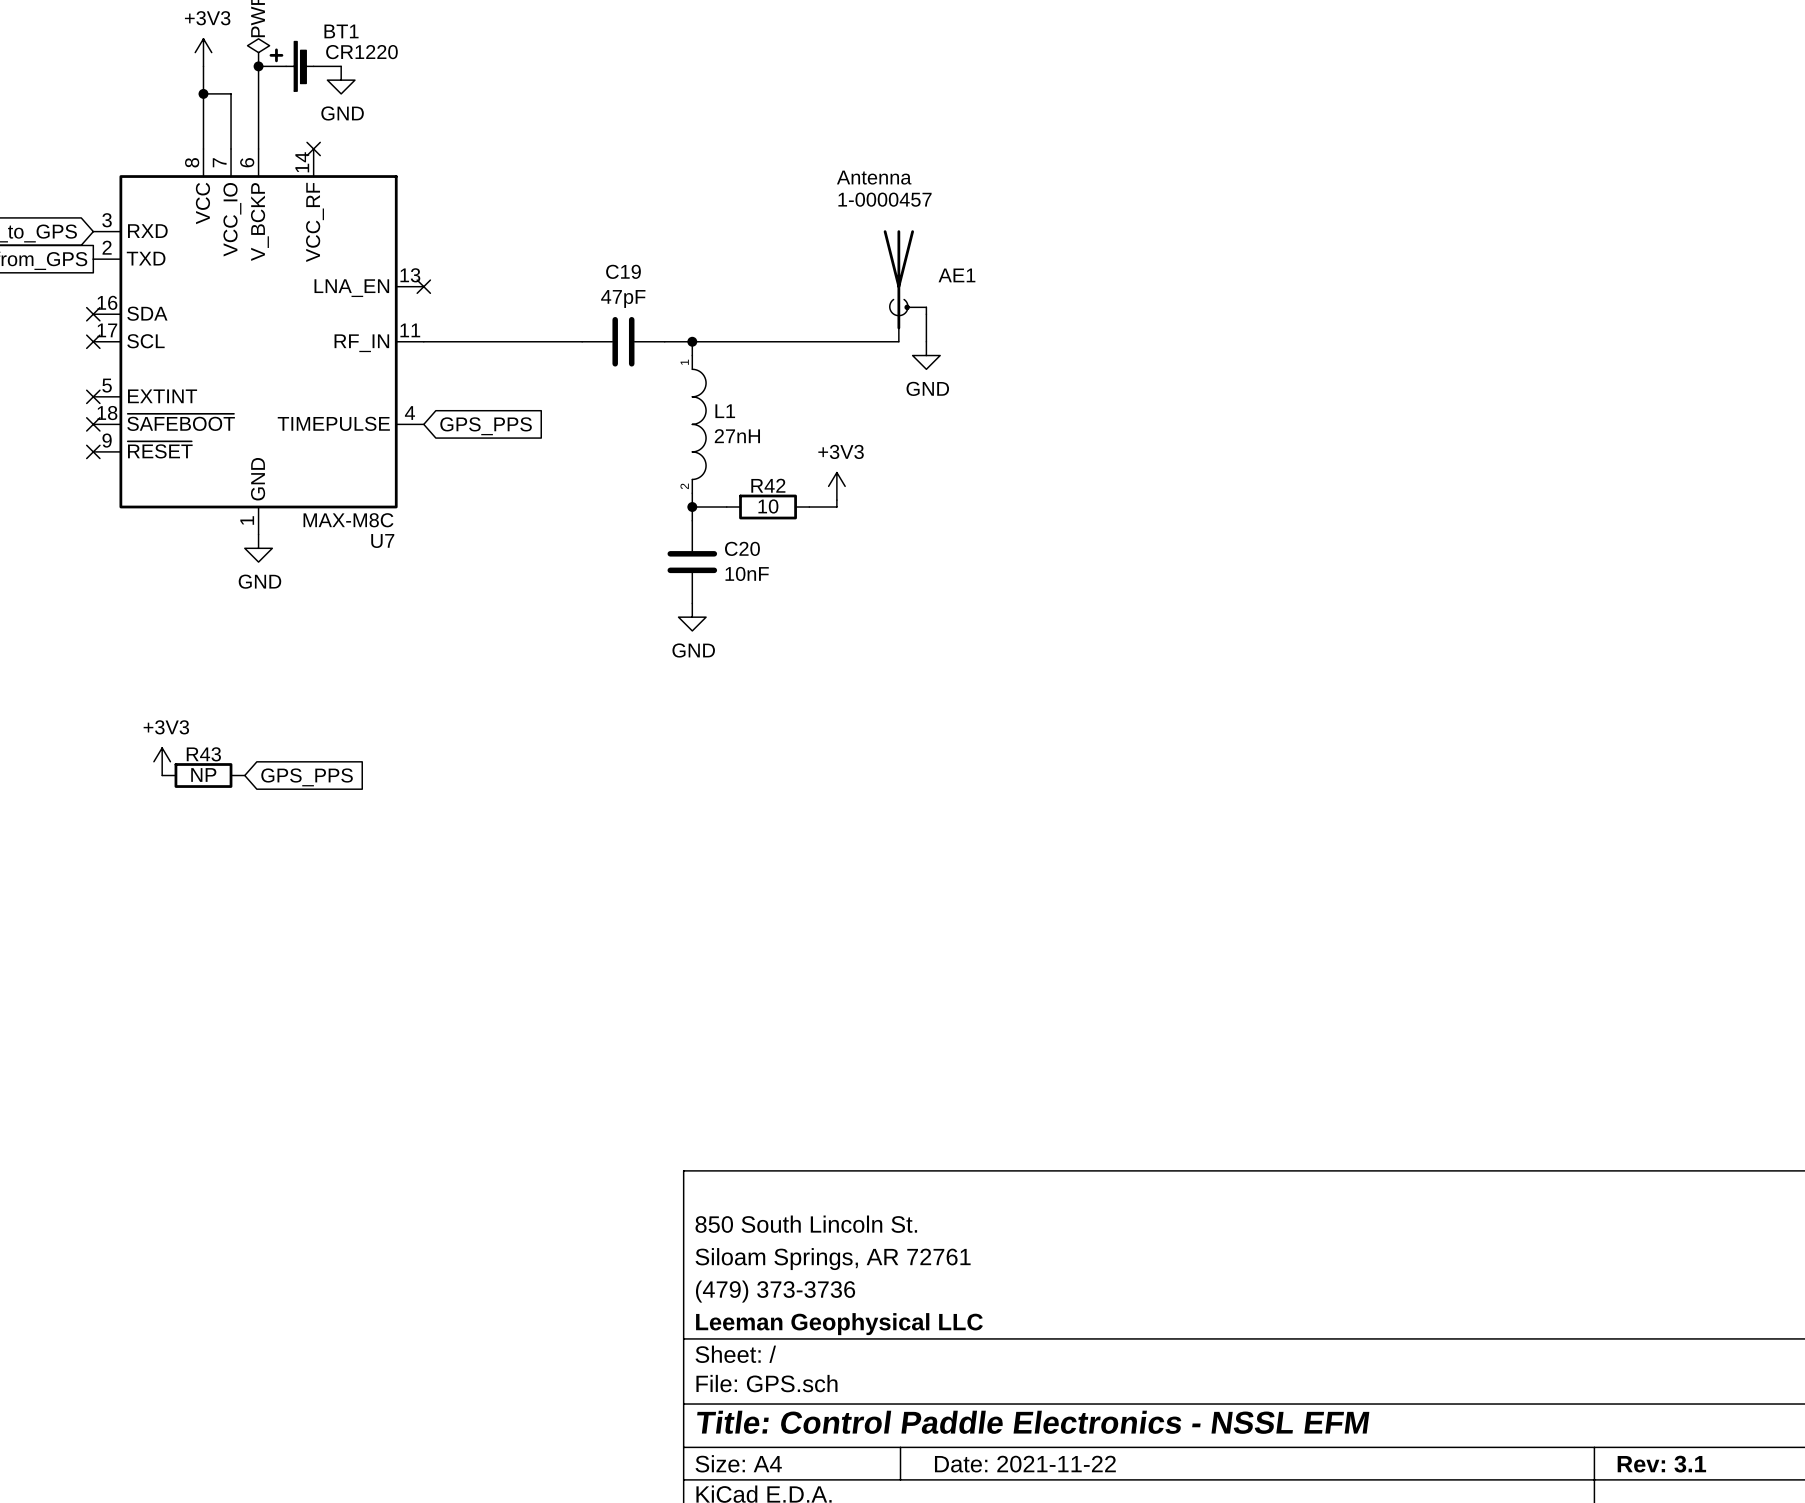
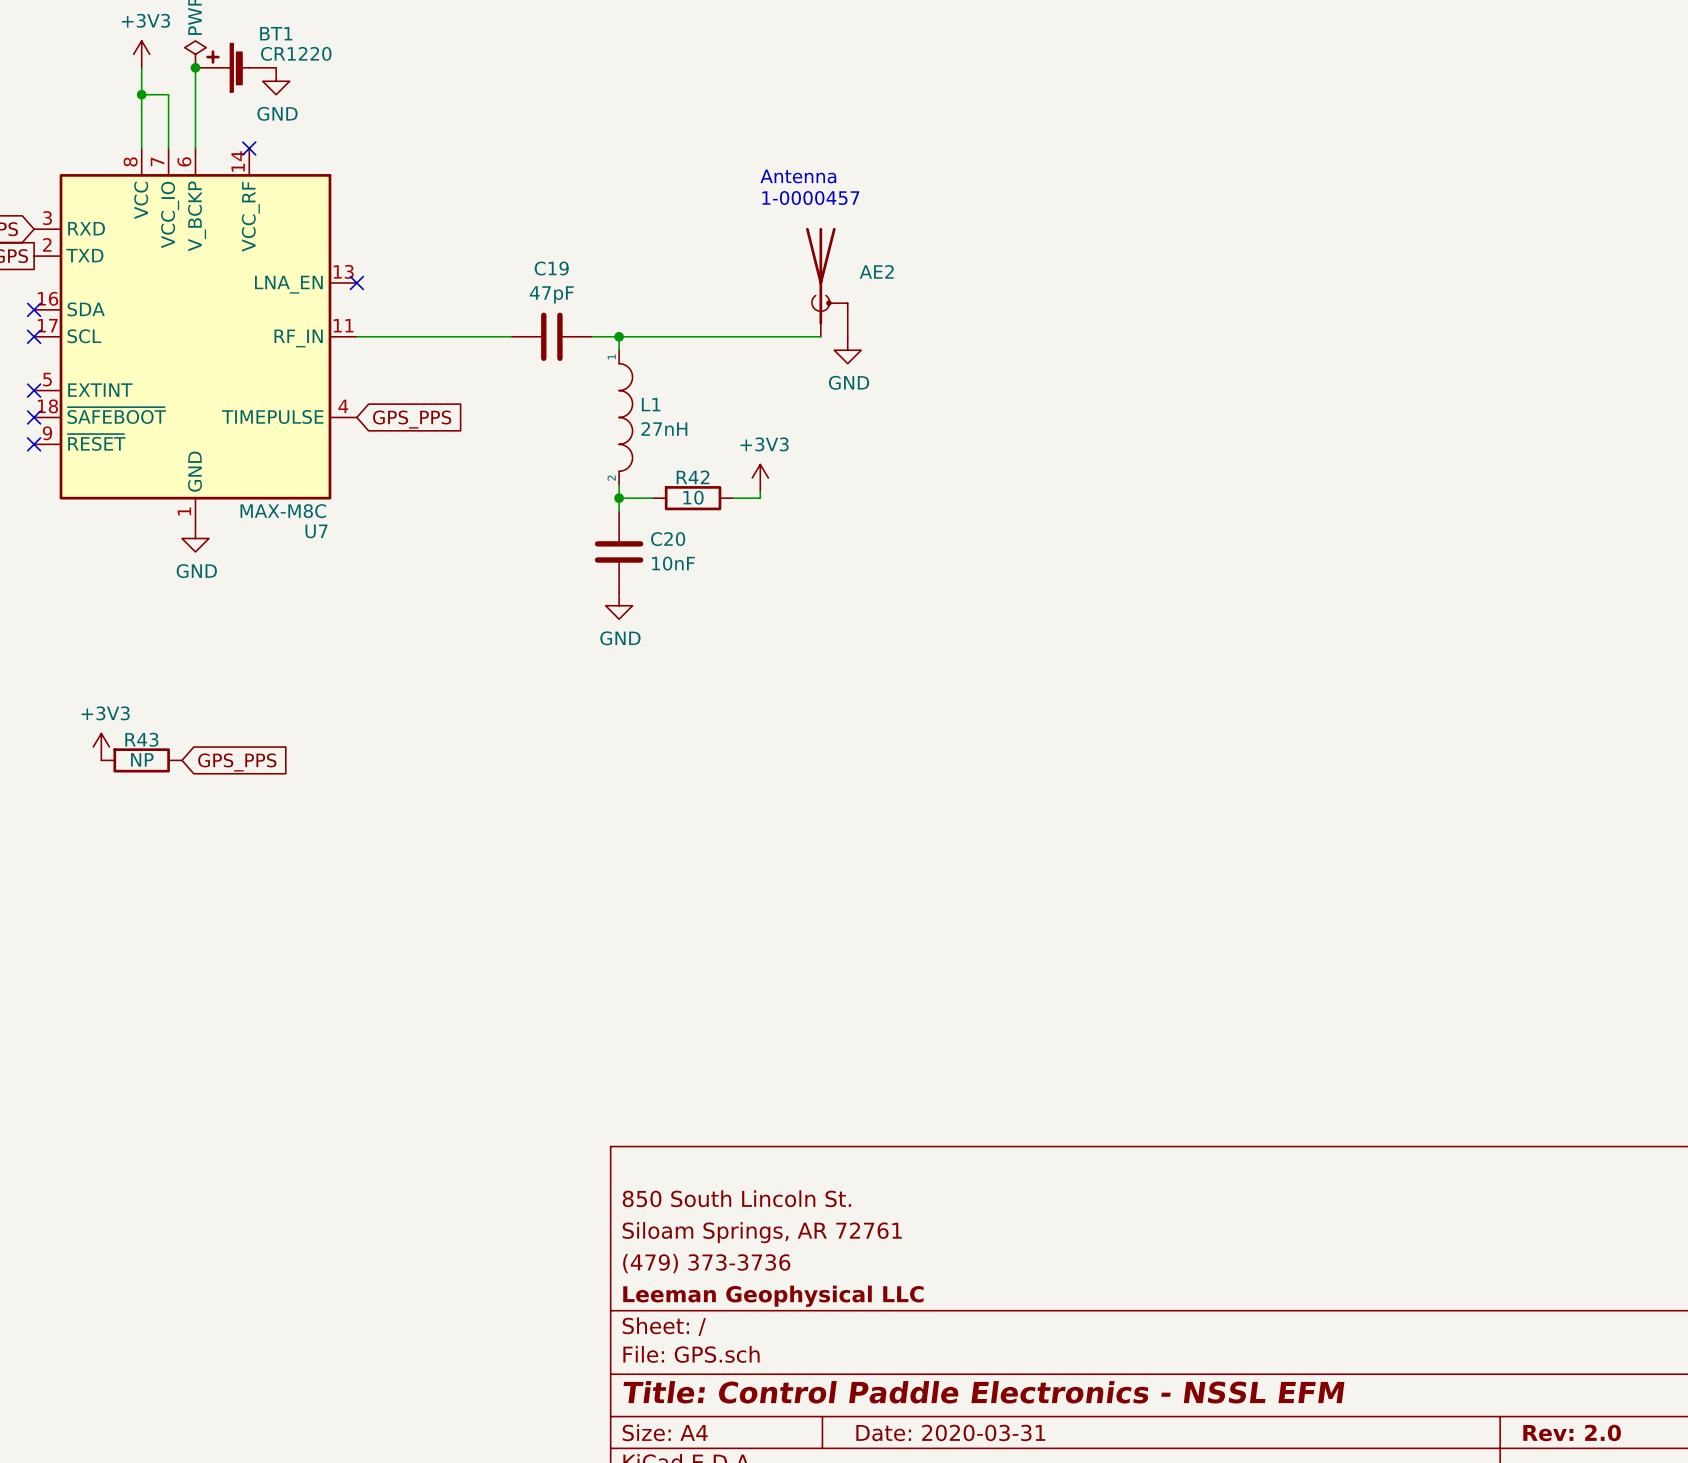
AE1 name: AE1 (956, 275) -> AE2 (876, 271)
title block: Date: 2021-11-22 (1025, 1464) -> Date: 2020-03-31 (950, 1432)
title block: Rev: 3.1 (1661, 1464) -> Rev: 2.0 (1572, 1432)

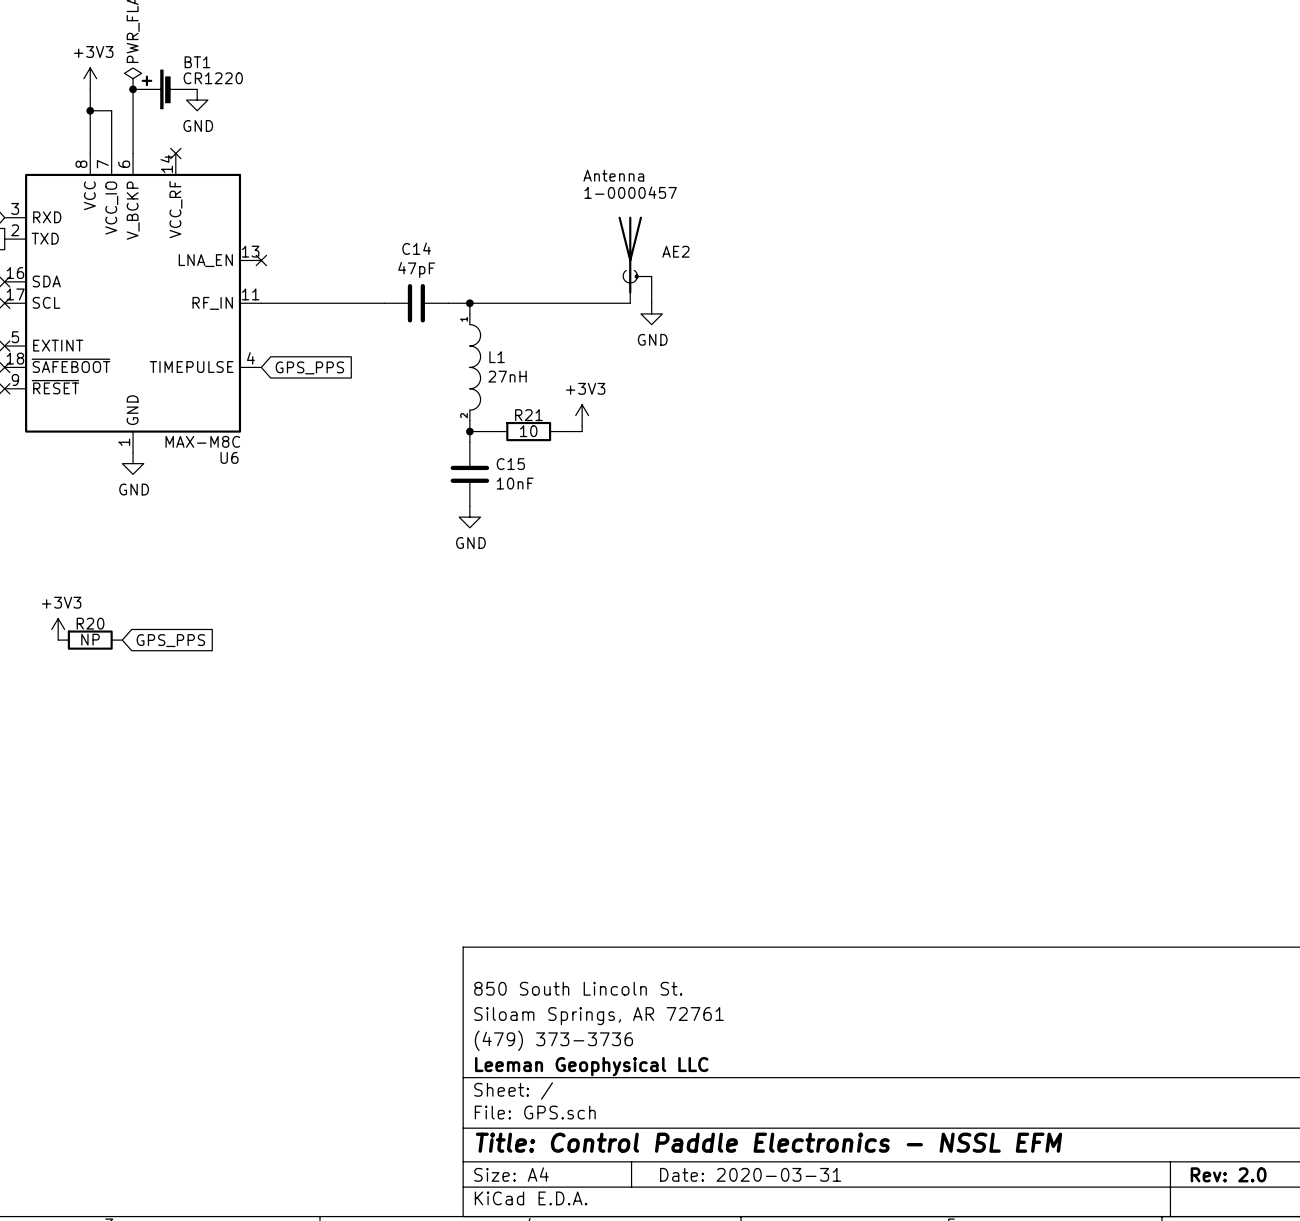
C19 name: C19 (551, 268) -> C14 (416, 248)
R42 name: R42 (693, 477) -> R21 (528, 415)
U7 name: U7 (316, 531) -> U6 (229, 457)
C20 name: C20 (668, 539) -> C15 (510, 464)
R43 name: R43 (141, 739) -> R20 (90, 623)

